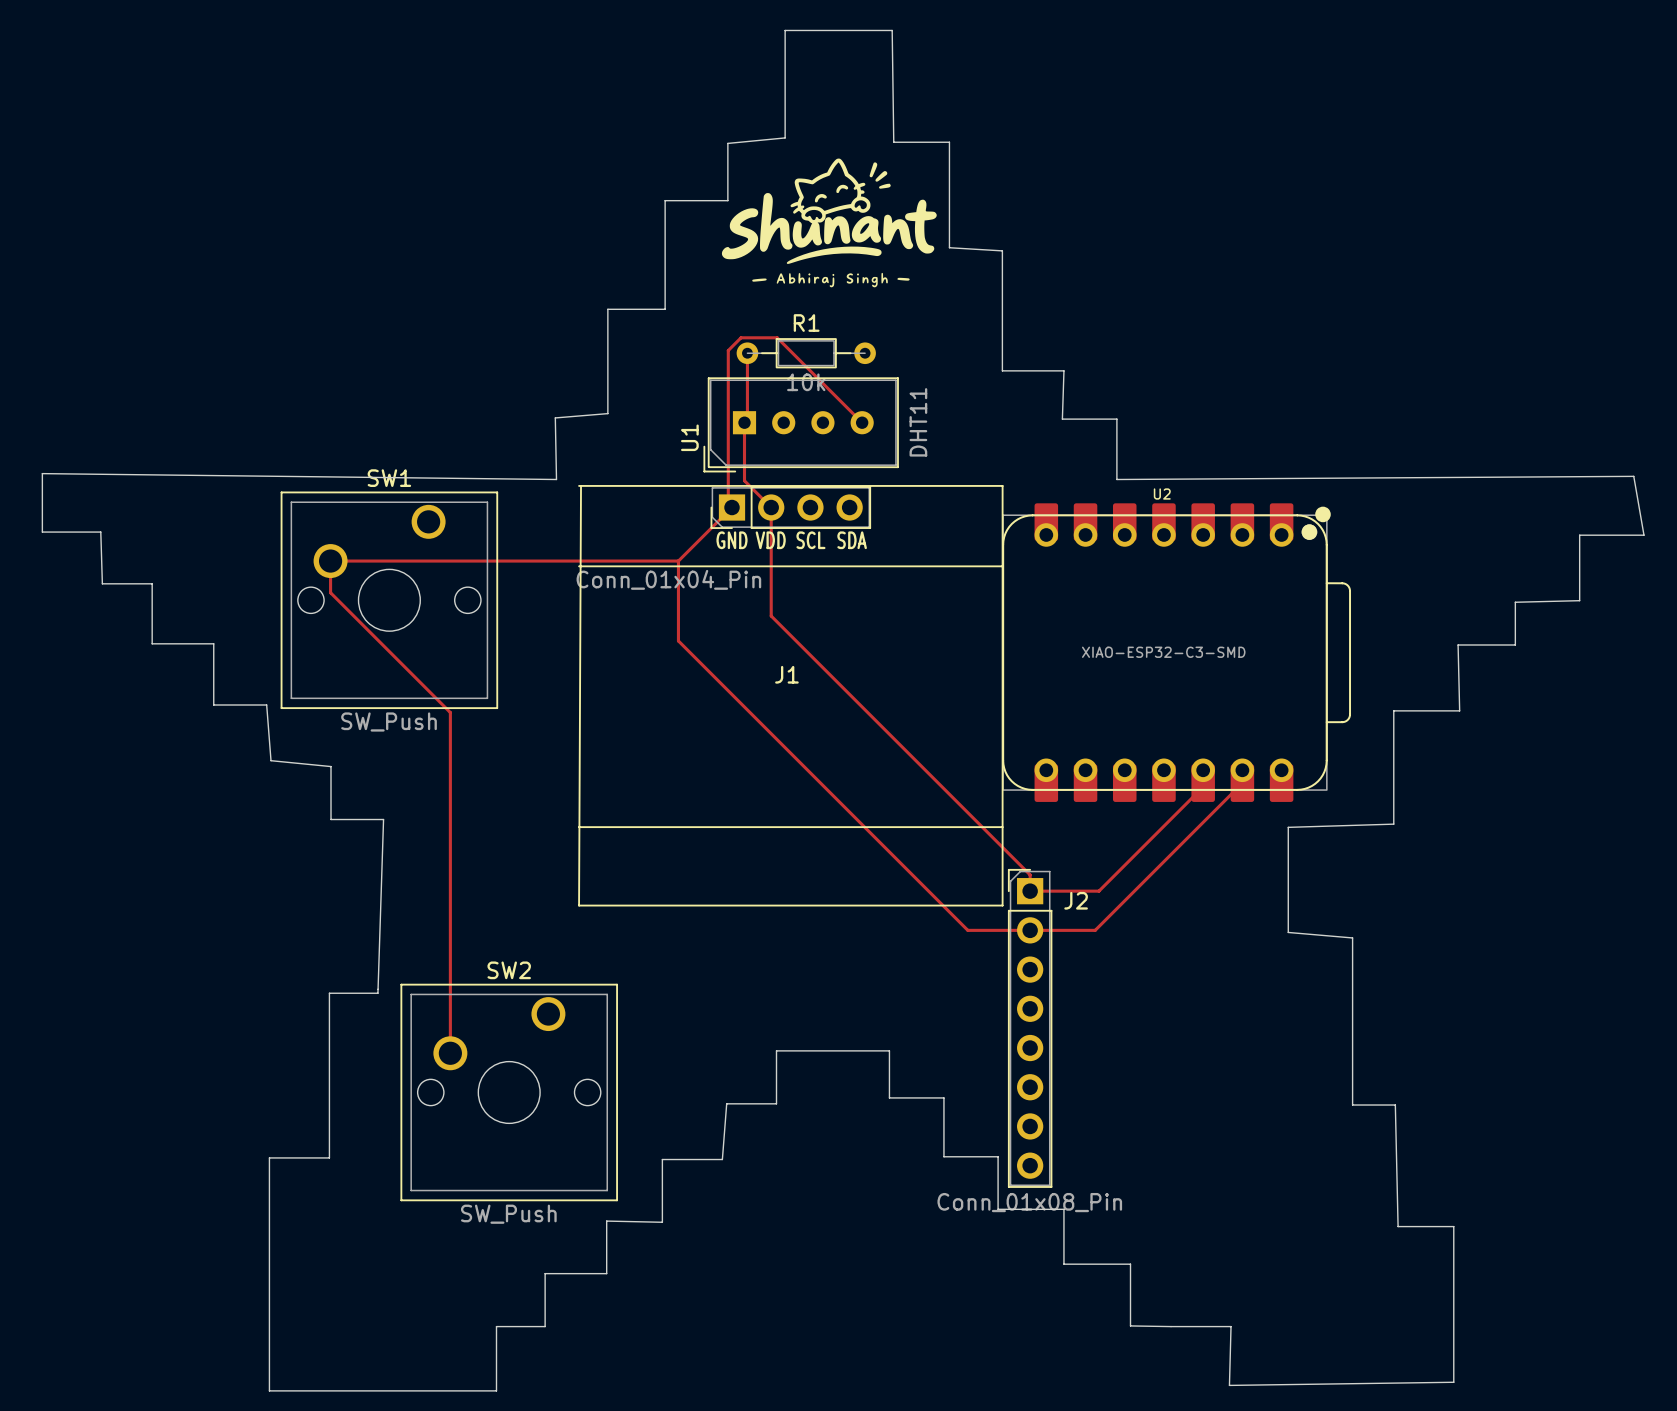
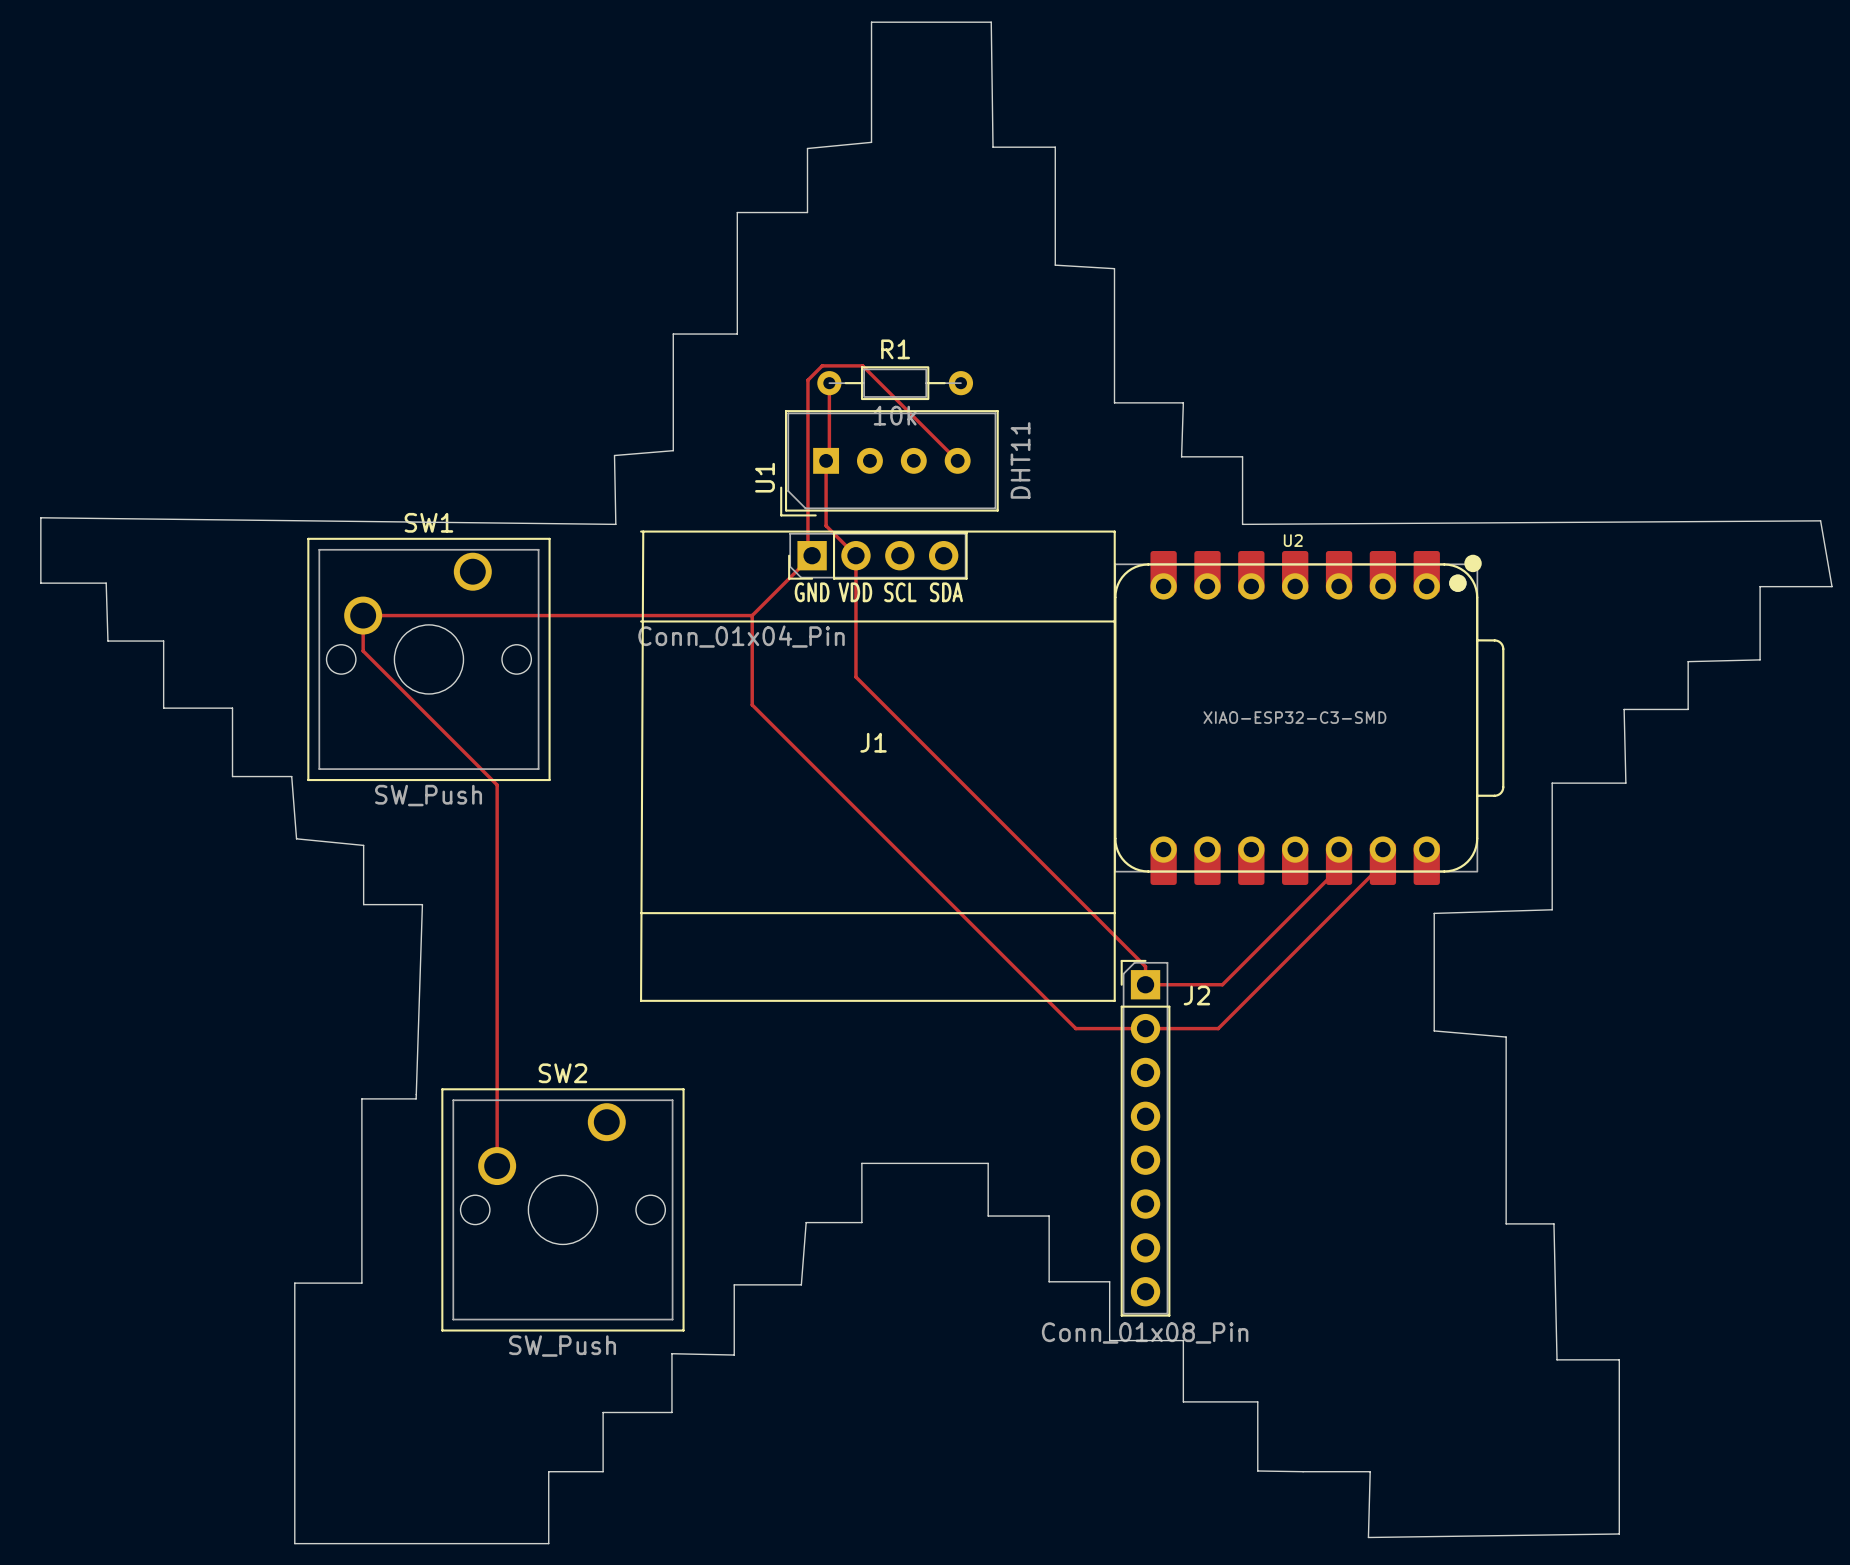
drawing: [721, 158, 937, 288] -> none

